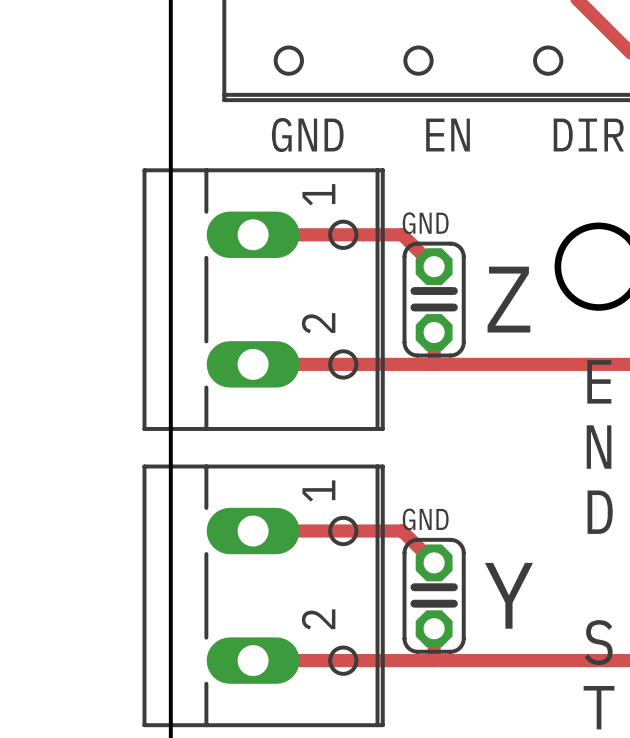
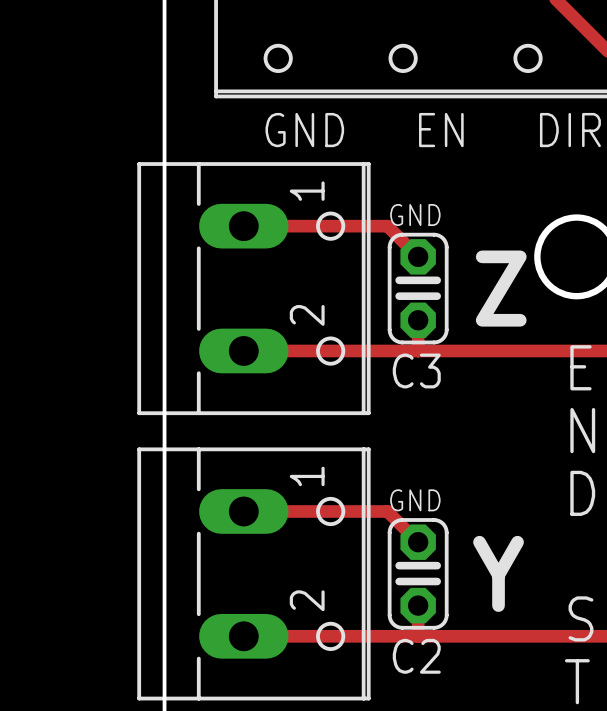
C3 name: none -> C3 (416, 370)
C2 name: none -> C2 (416, 656)

